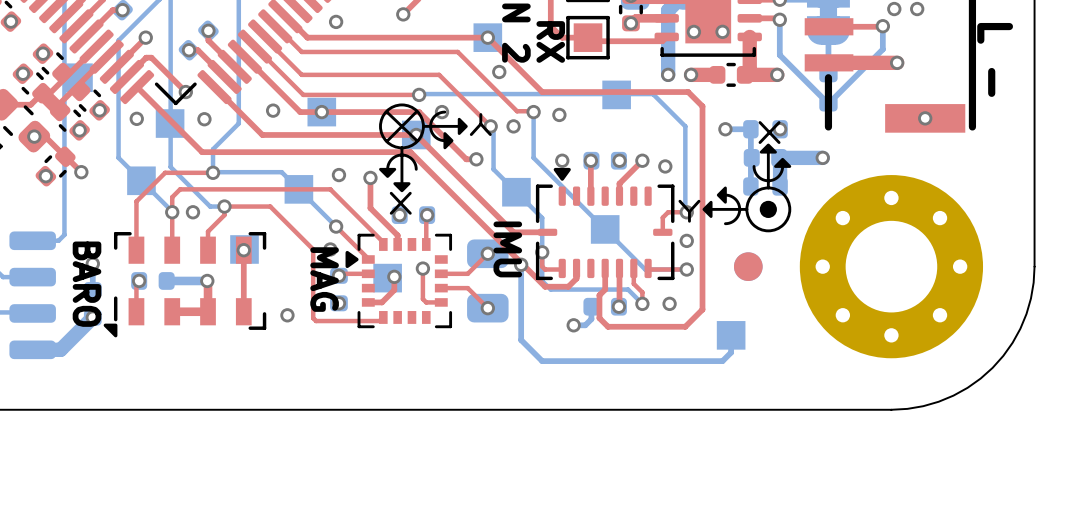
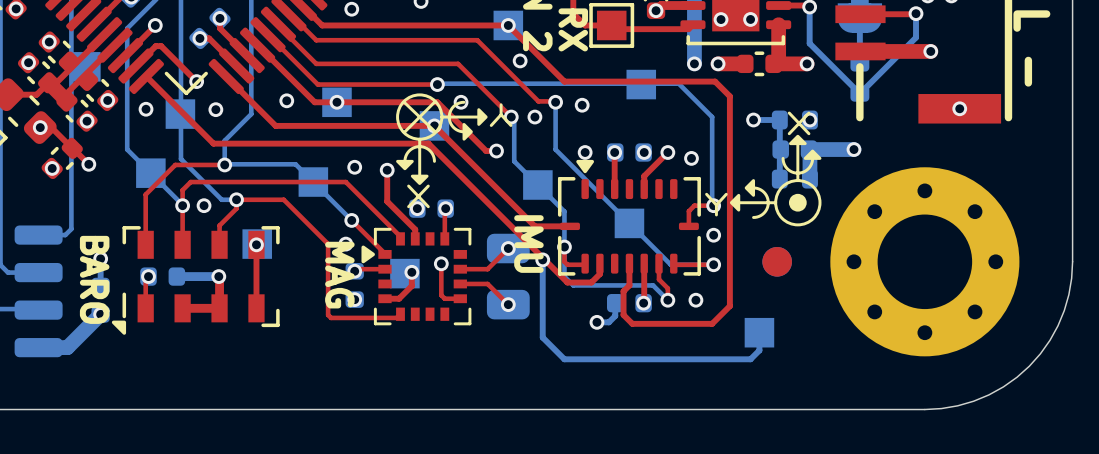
via: (287, 315) -> none

